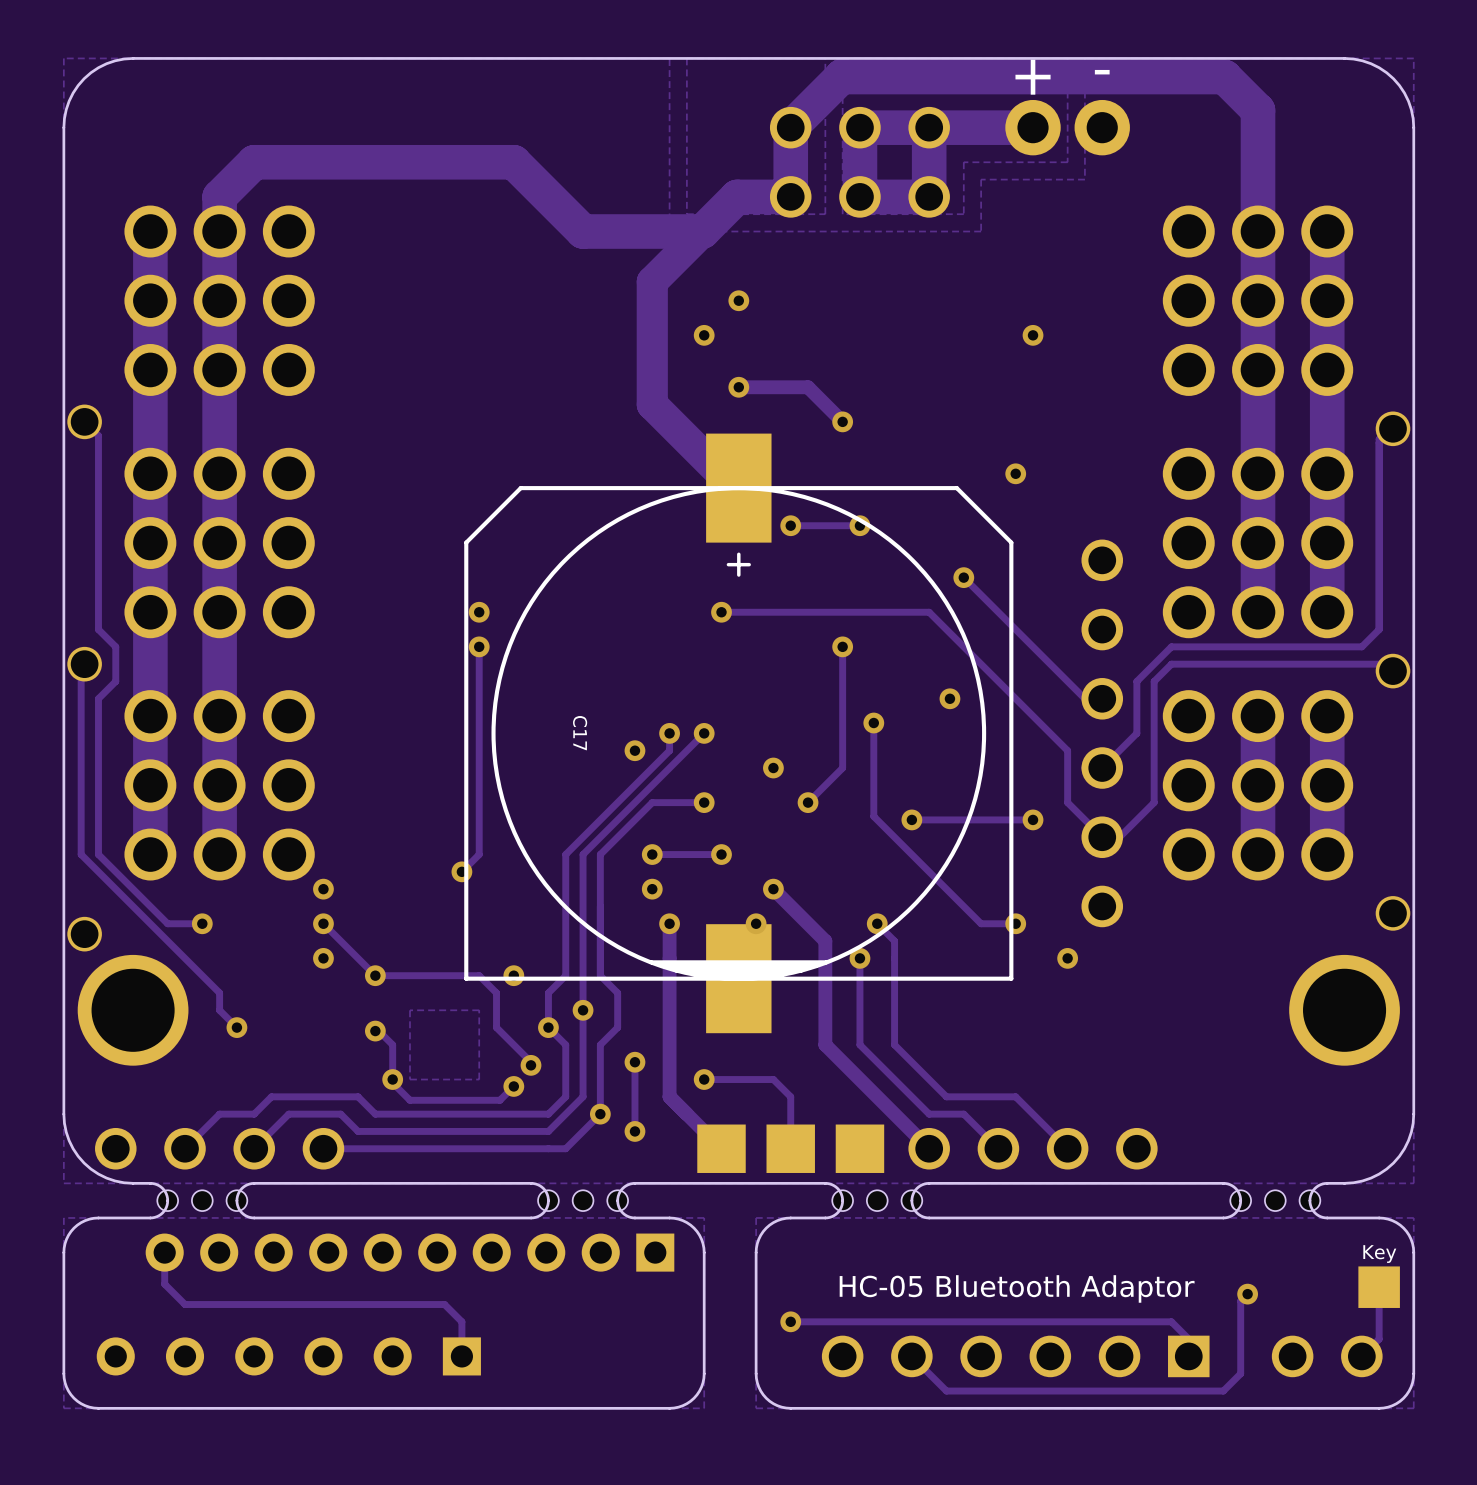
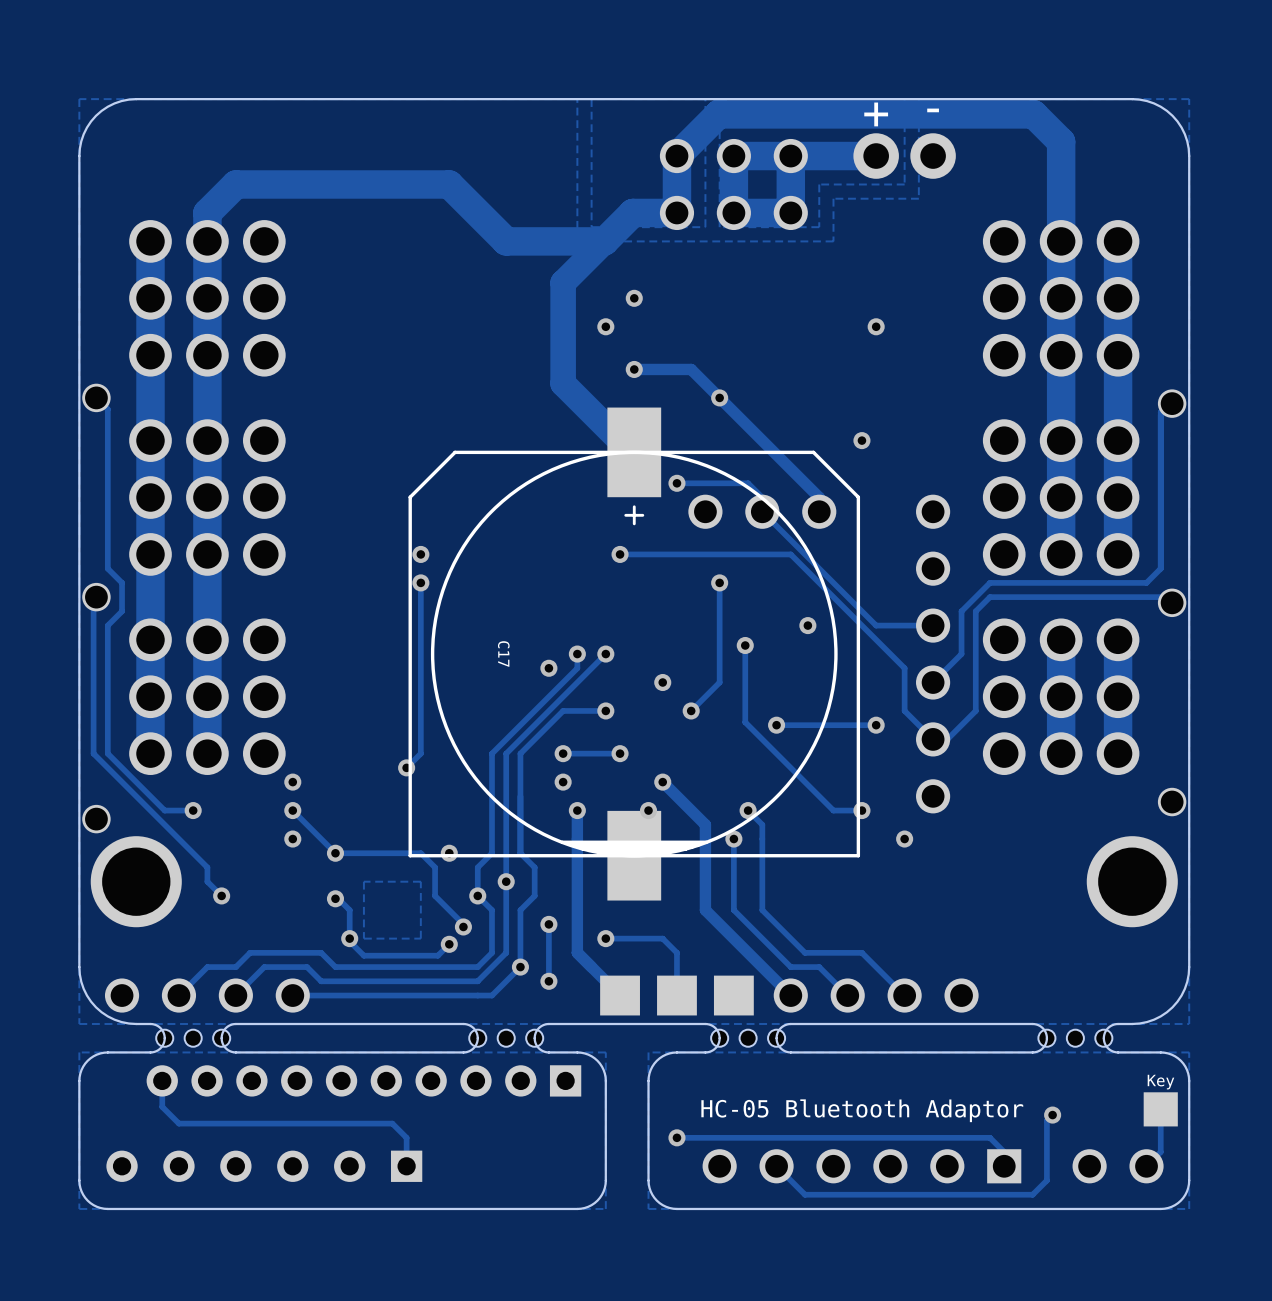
track: none -> (719, 397) (819, 497) (819, 511)
via: (859, 525) -> none
part: none -> (762, 511)
track: (963, 577) (1084, 698) -> (733, 483) (748, 483) (762, 497) (762, 511) (876, 625) (918, 625)
via: (963, 577) -> none

